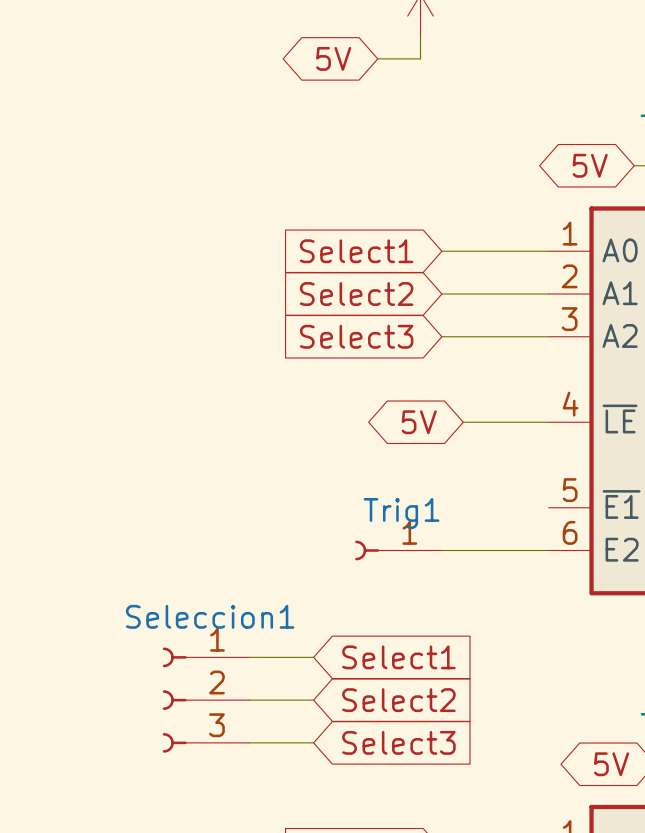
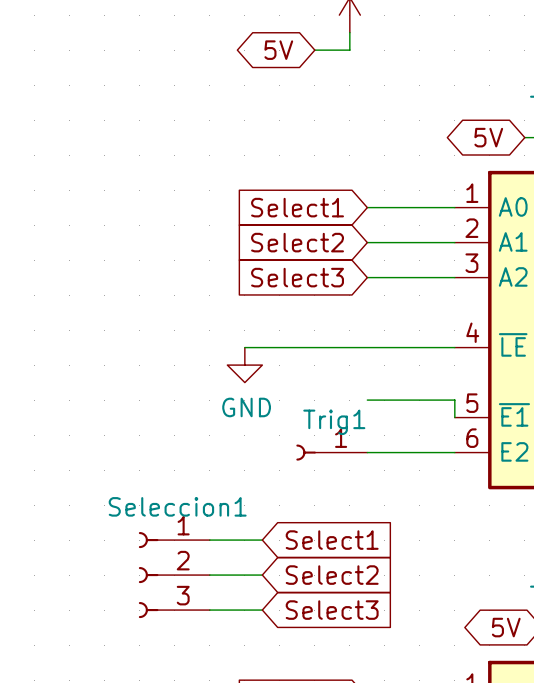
wire: none -> (244, 347) (384, 347)
global label: 5V (419, 422) -> none
power symbol: none -> GND (244, 365)
wire: none -> (367, 400) (454, 400) (454, 417)

